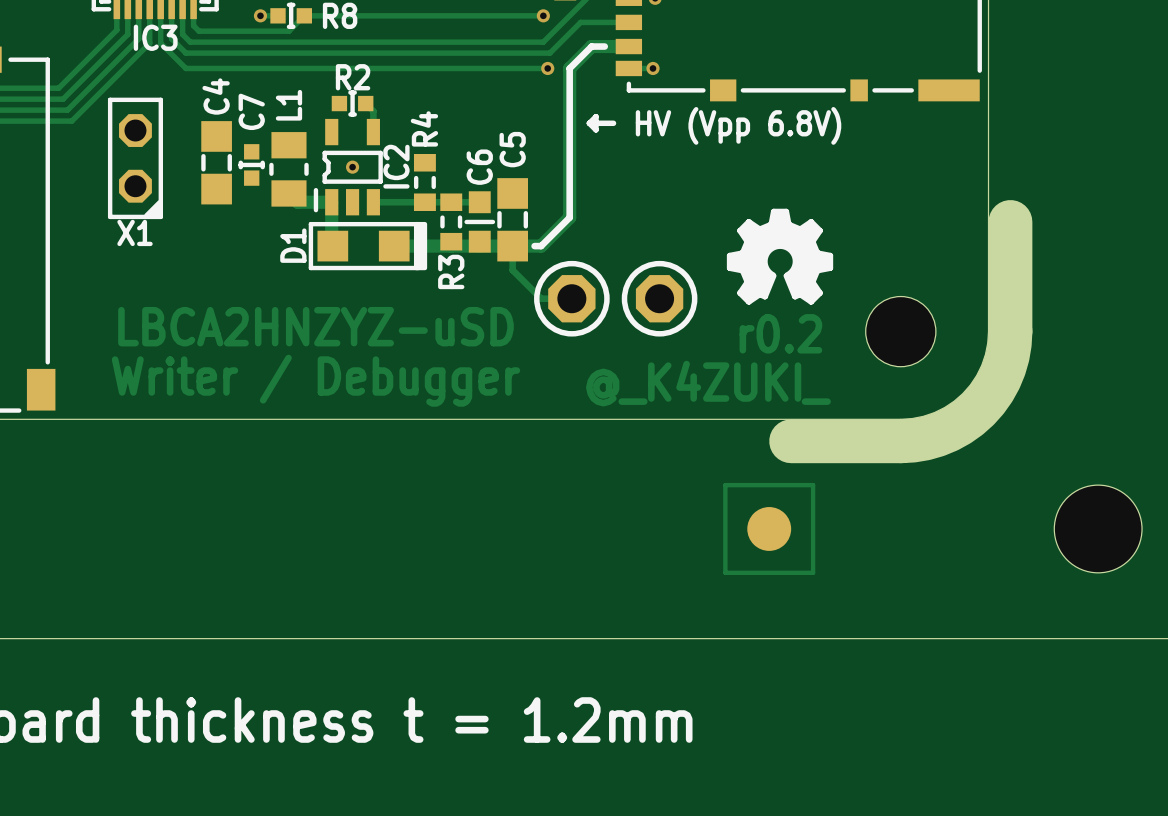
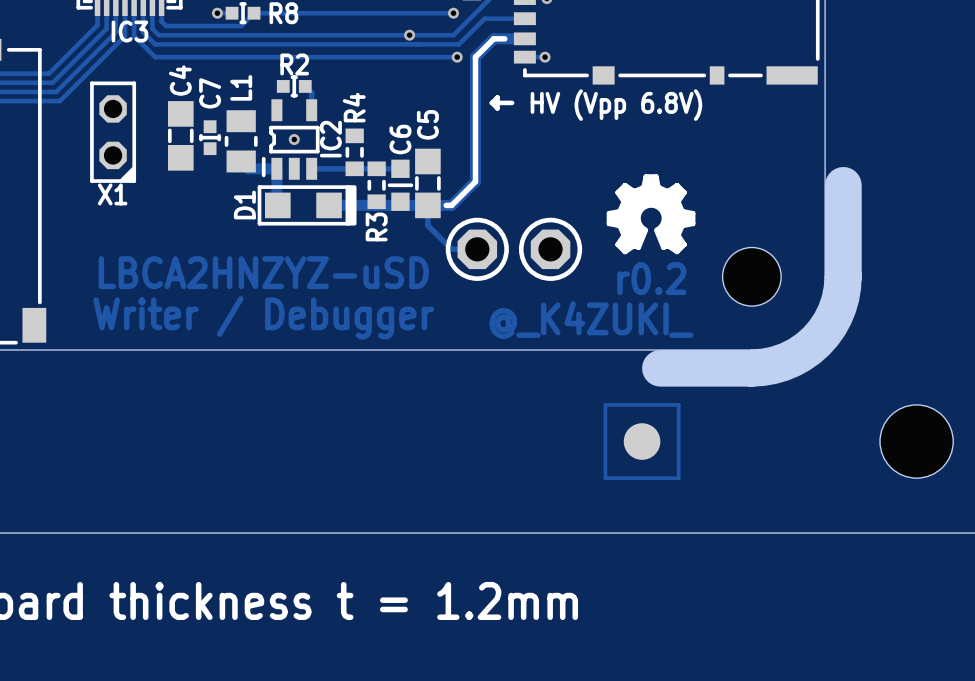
via: none -> (409, 35)

